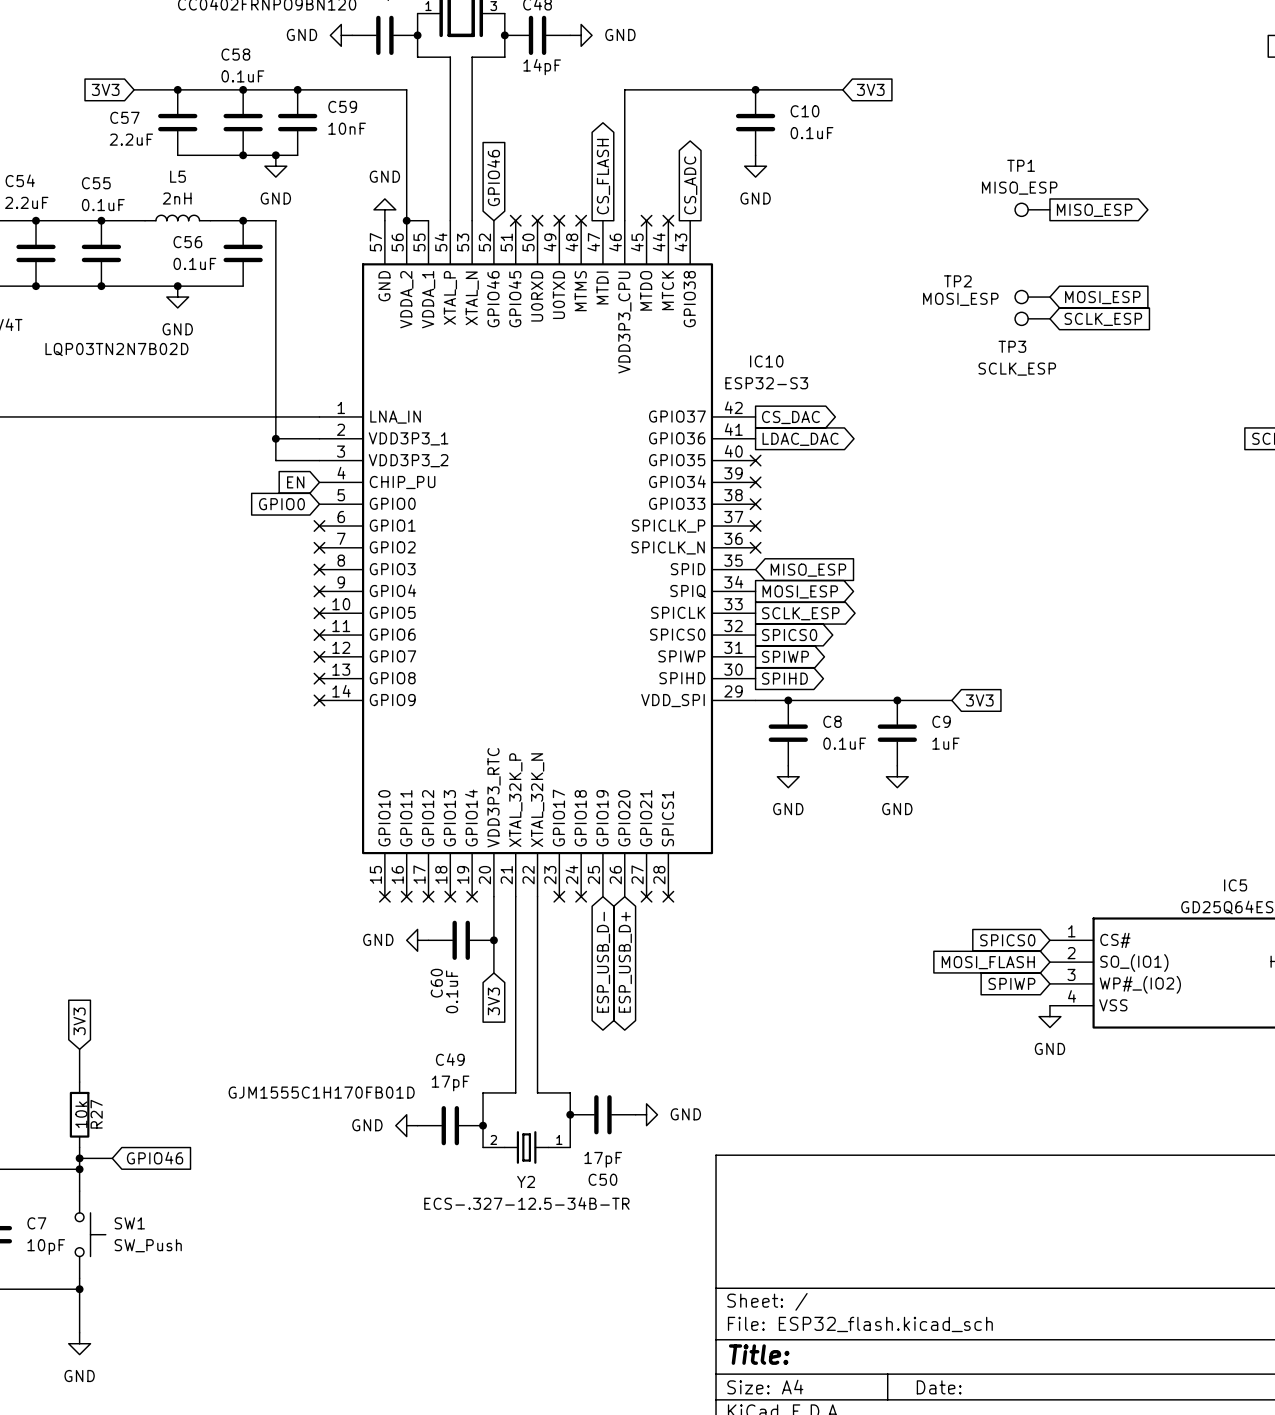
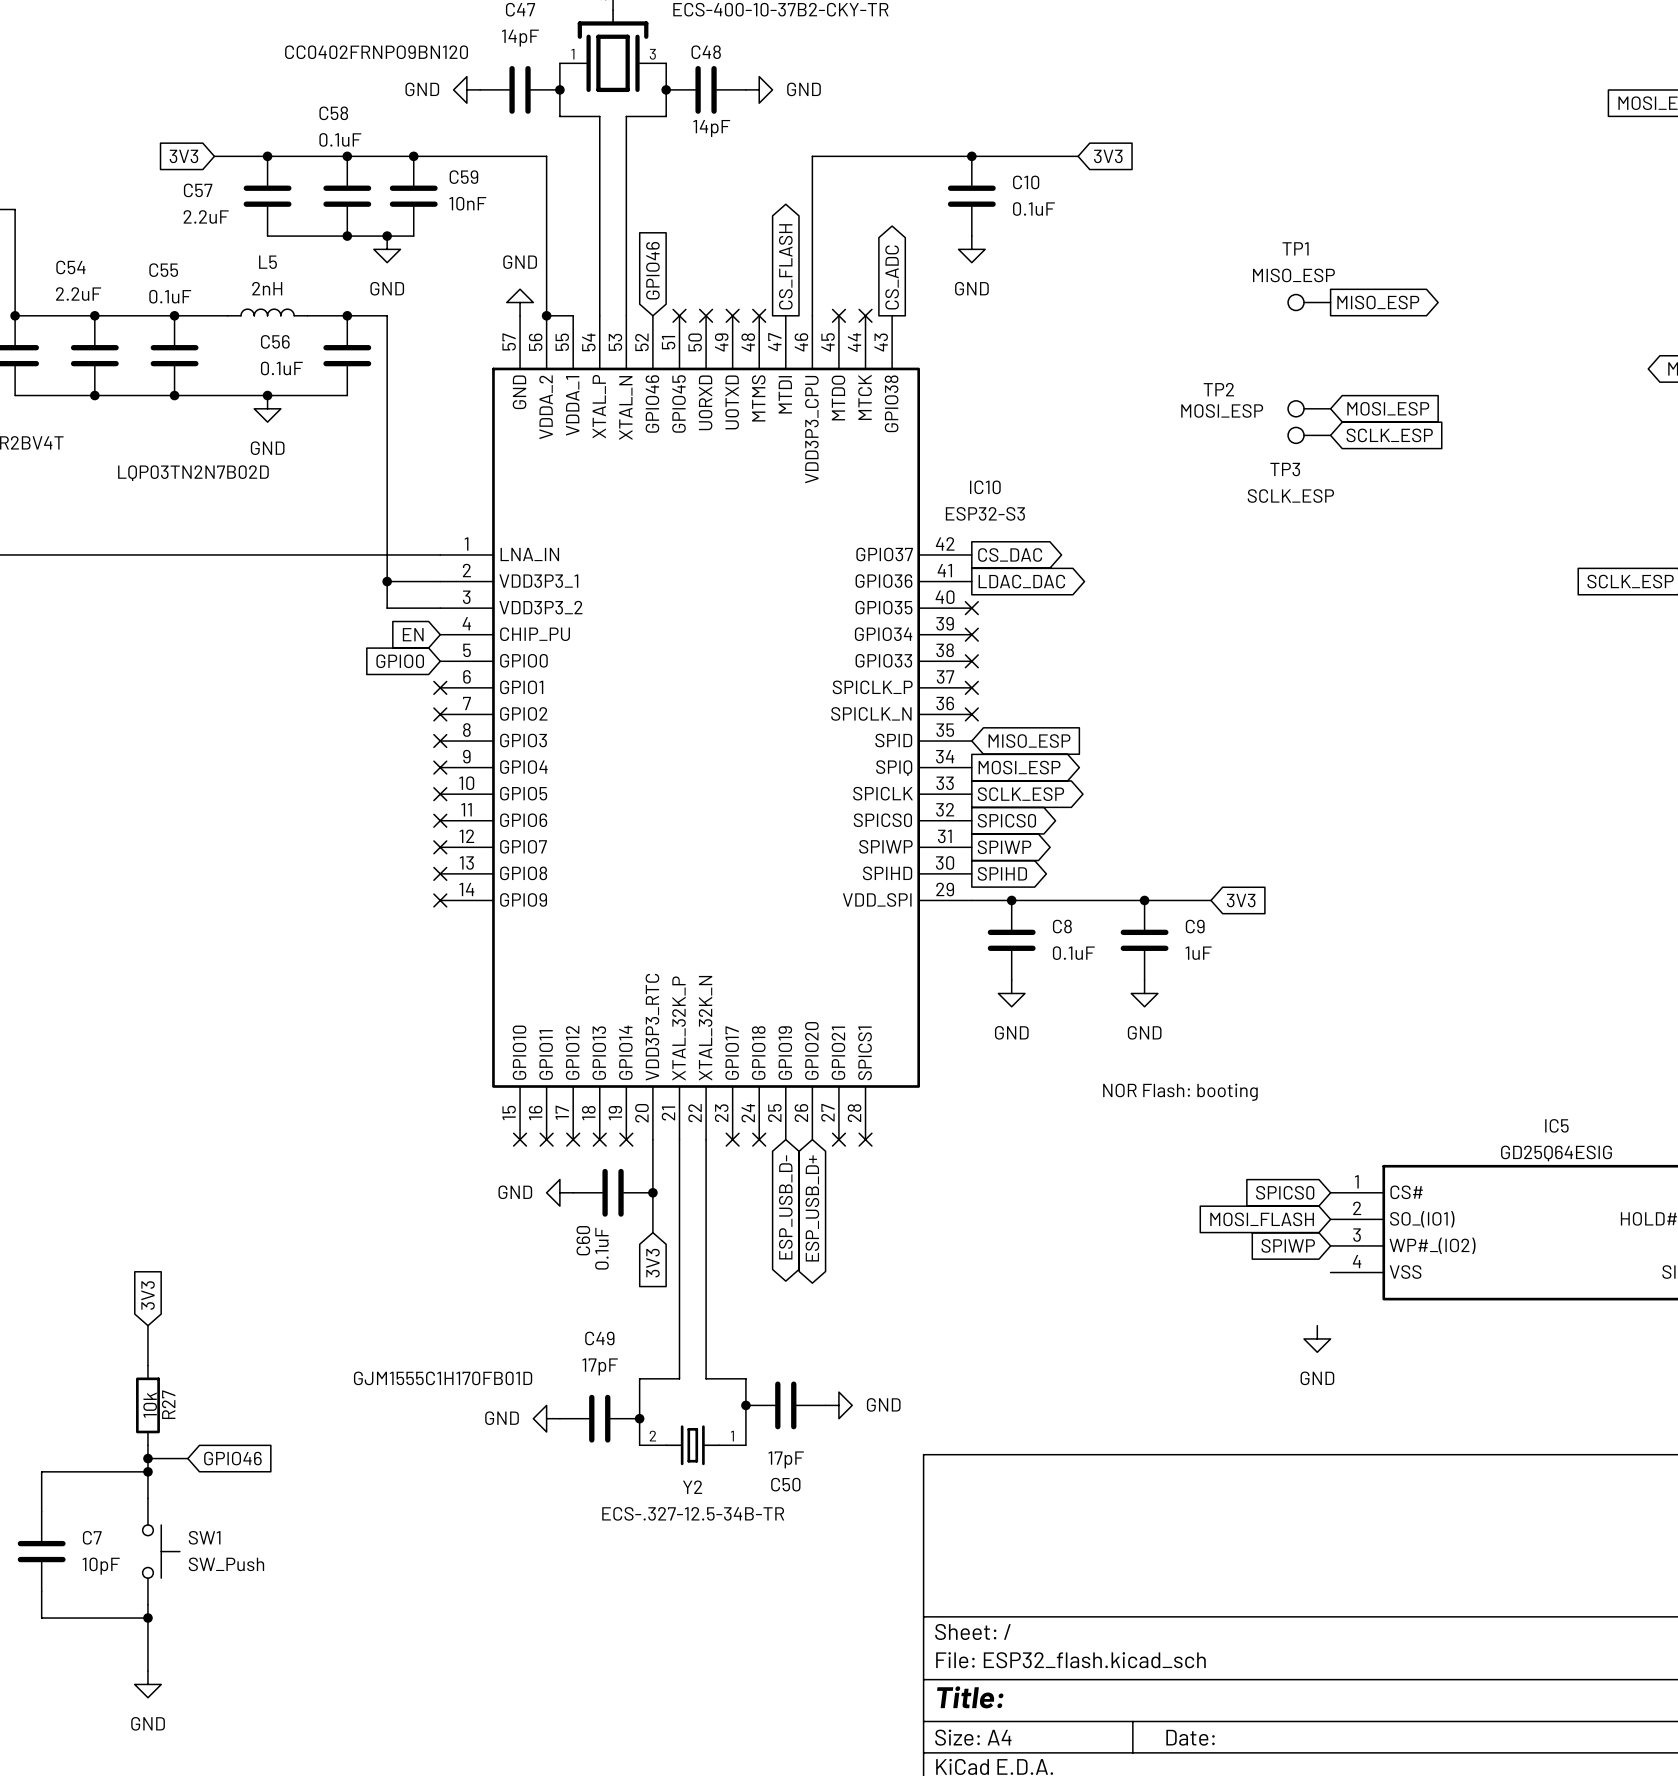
text: none -> NOR Flash: booting (1180, 1092)
power symbol position: GND (1049, 1016) -> GND (1317, 1338)

